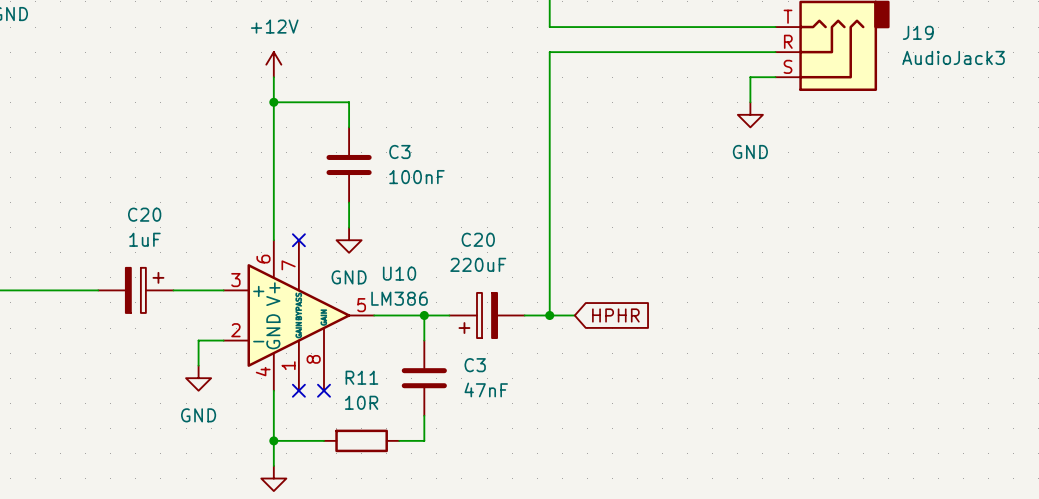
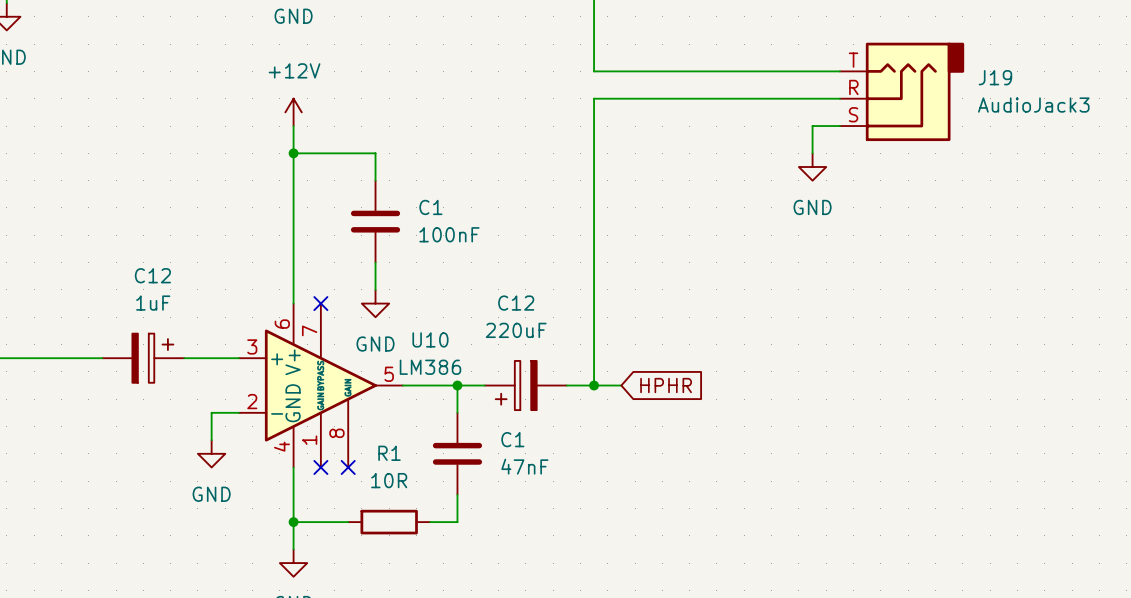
C3 name: C3 (399, 151) -> C1 (430, 207)
C20 name: C20 (144, 214) -> C12 (152, 275)
C20 name: C20 (478, 239) -> C12 (516, 303)
C3 name: C3 (475, 365) -> C1 (512, 439)
R11 name: R11 (361, 377) -> R1 (389, 453)

